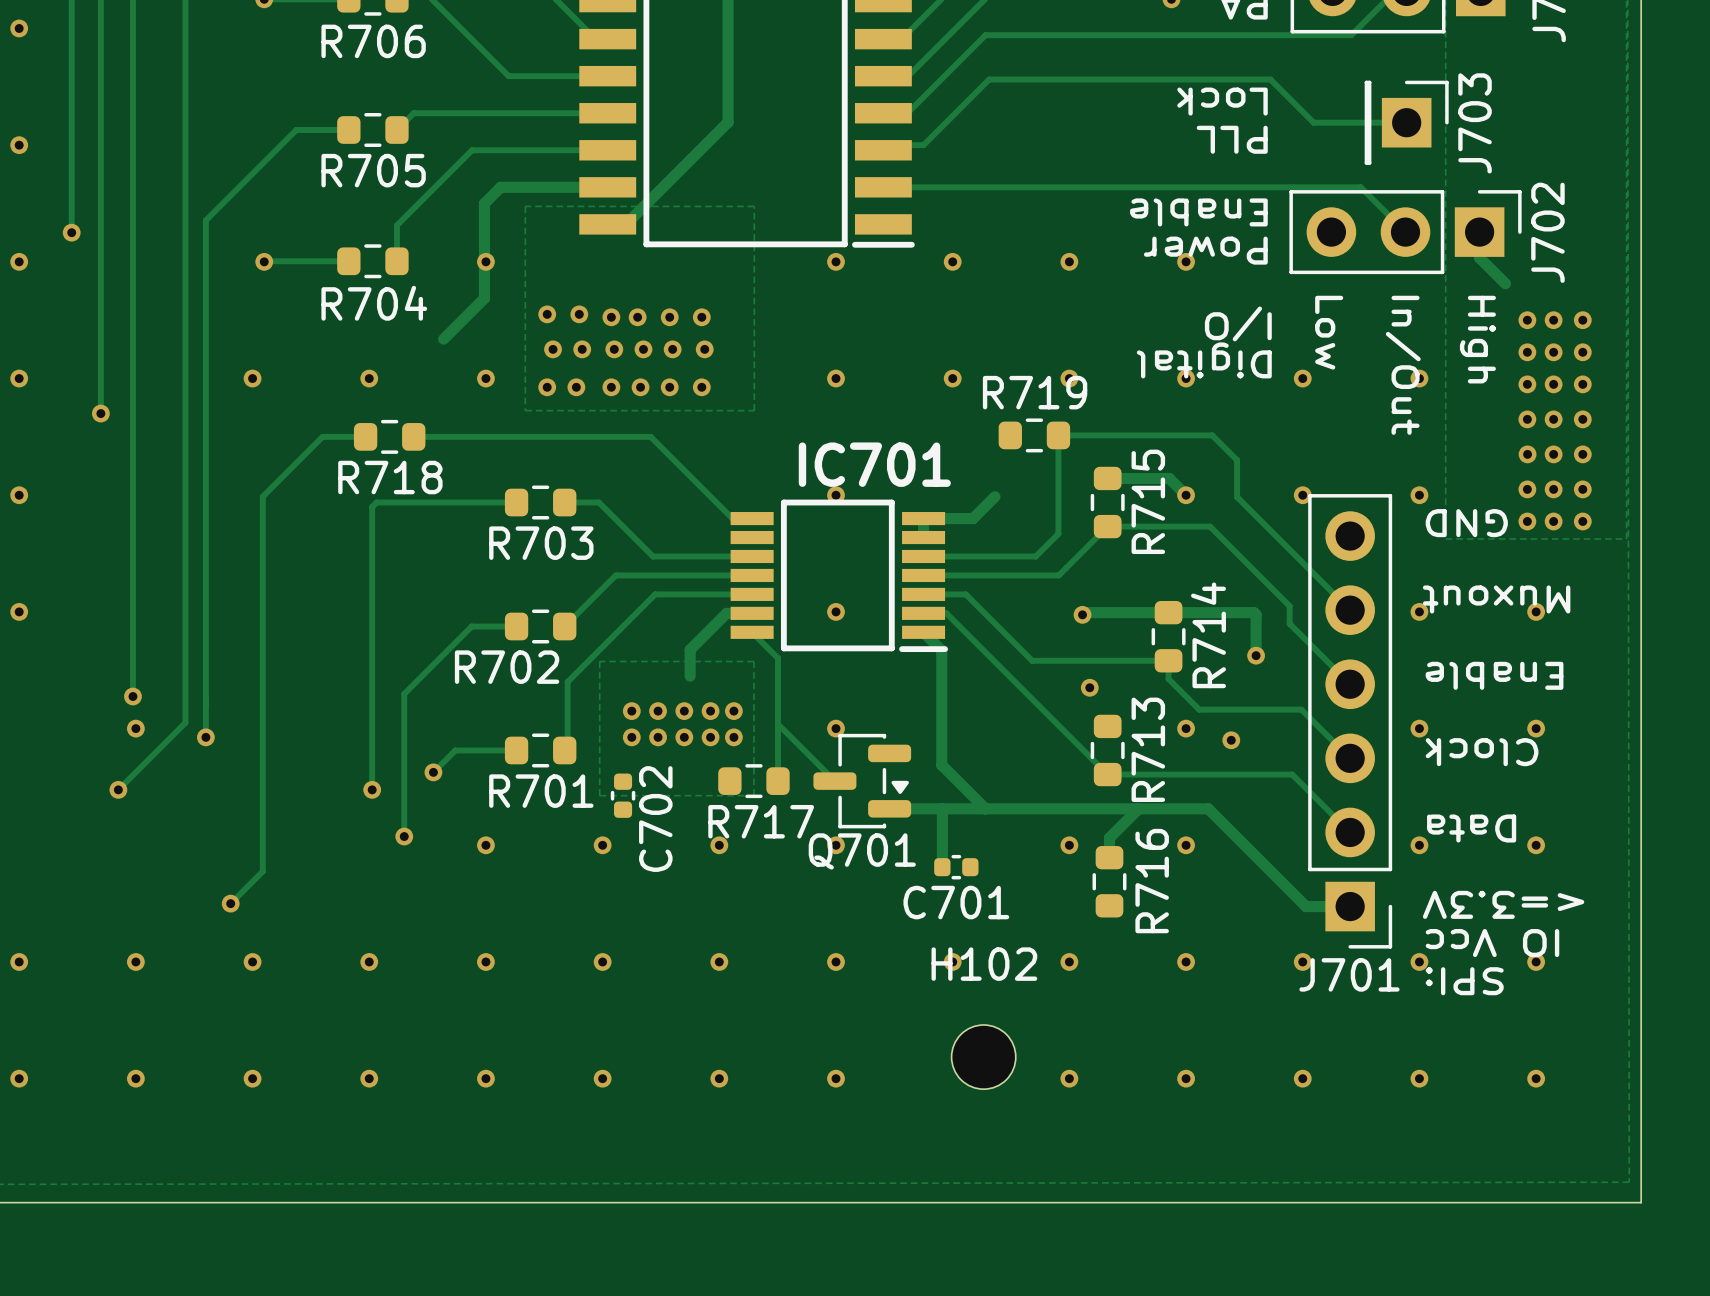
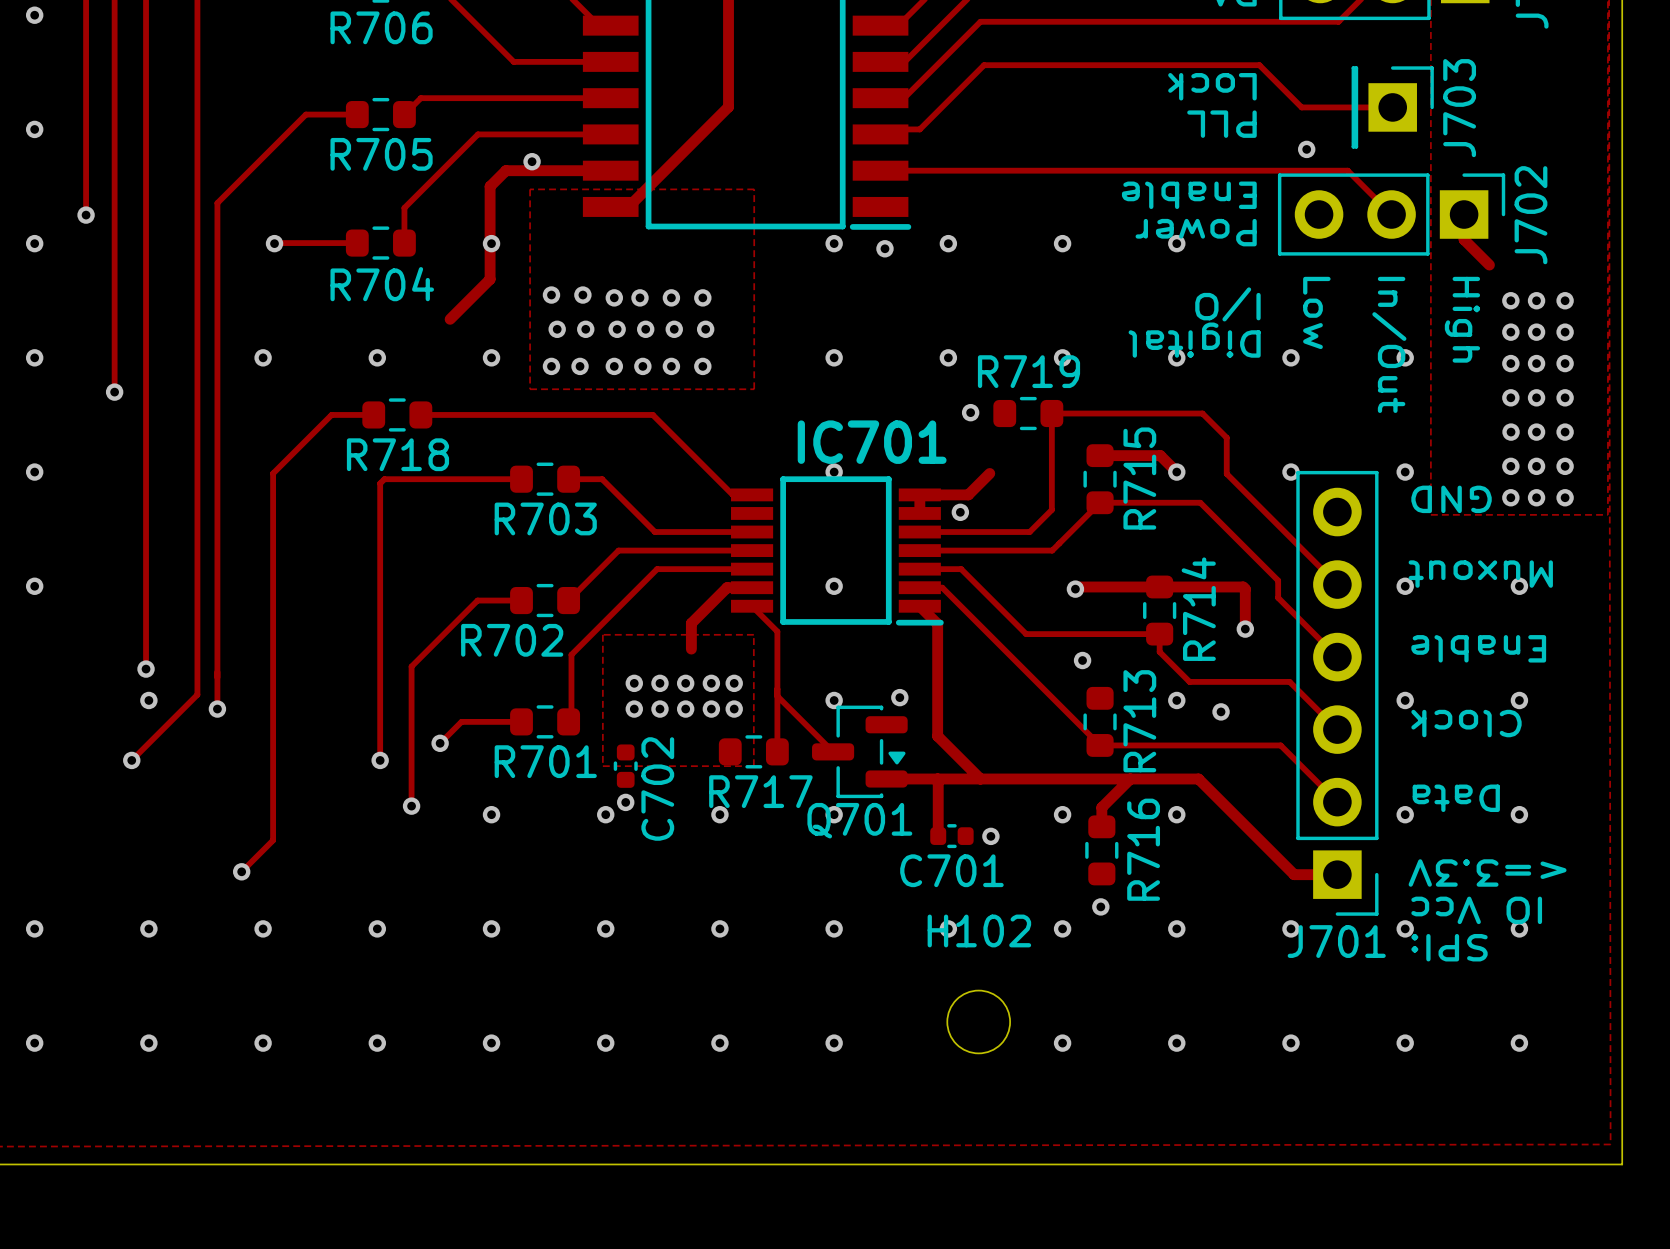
via: none -> (1306, 149)
via: none -> (532, 161)
via: none -> (884, 248)
via: none -> (970, 412)
via: none -> (960, 512)
via: none -> (899, 697)
via: none -> (625, 802)
via: none -> (990, 836)
via: none -> (1100, 906)

